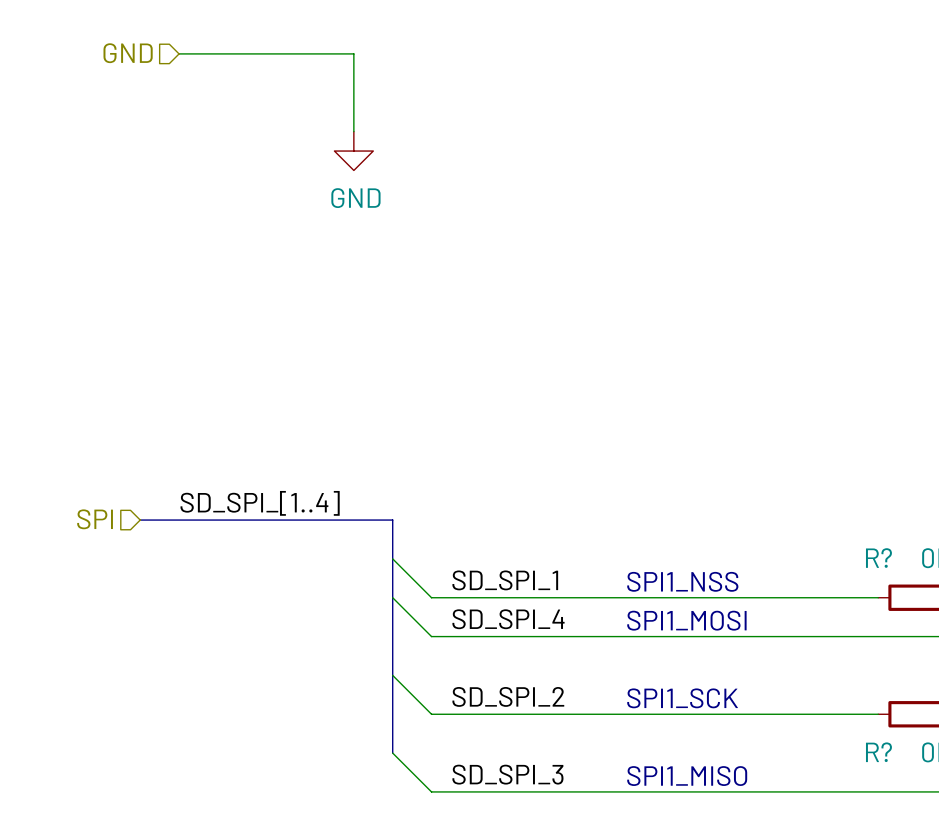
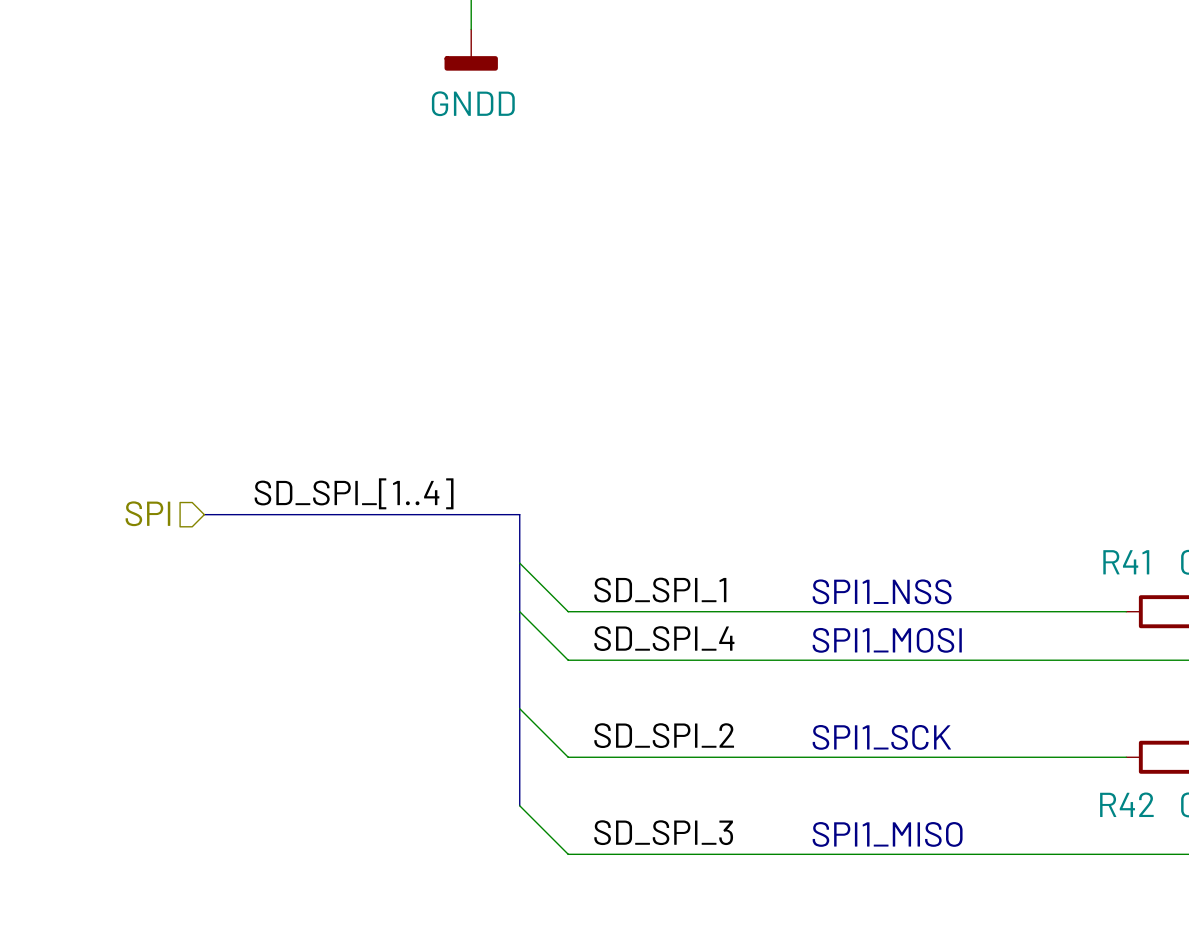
power symbol: GND (353, 151) -> GNDD (471, 50)
R? name: R? (878, 558) -> R41 (1126, 562)
R? name: R? (878, 752) -> R42 (1126, 804)

